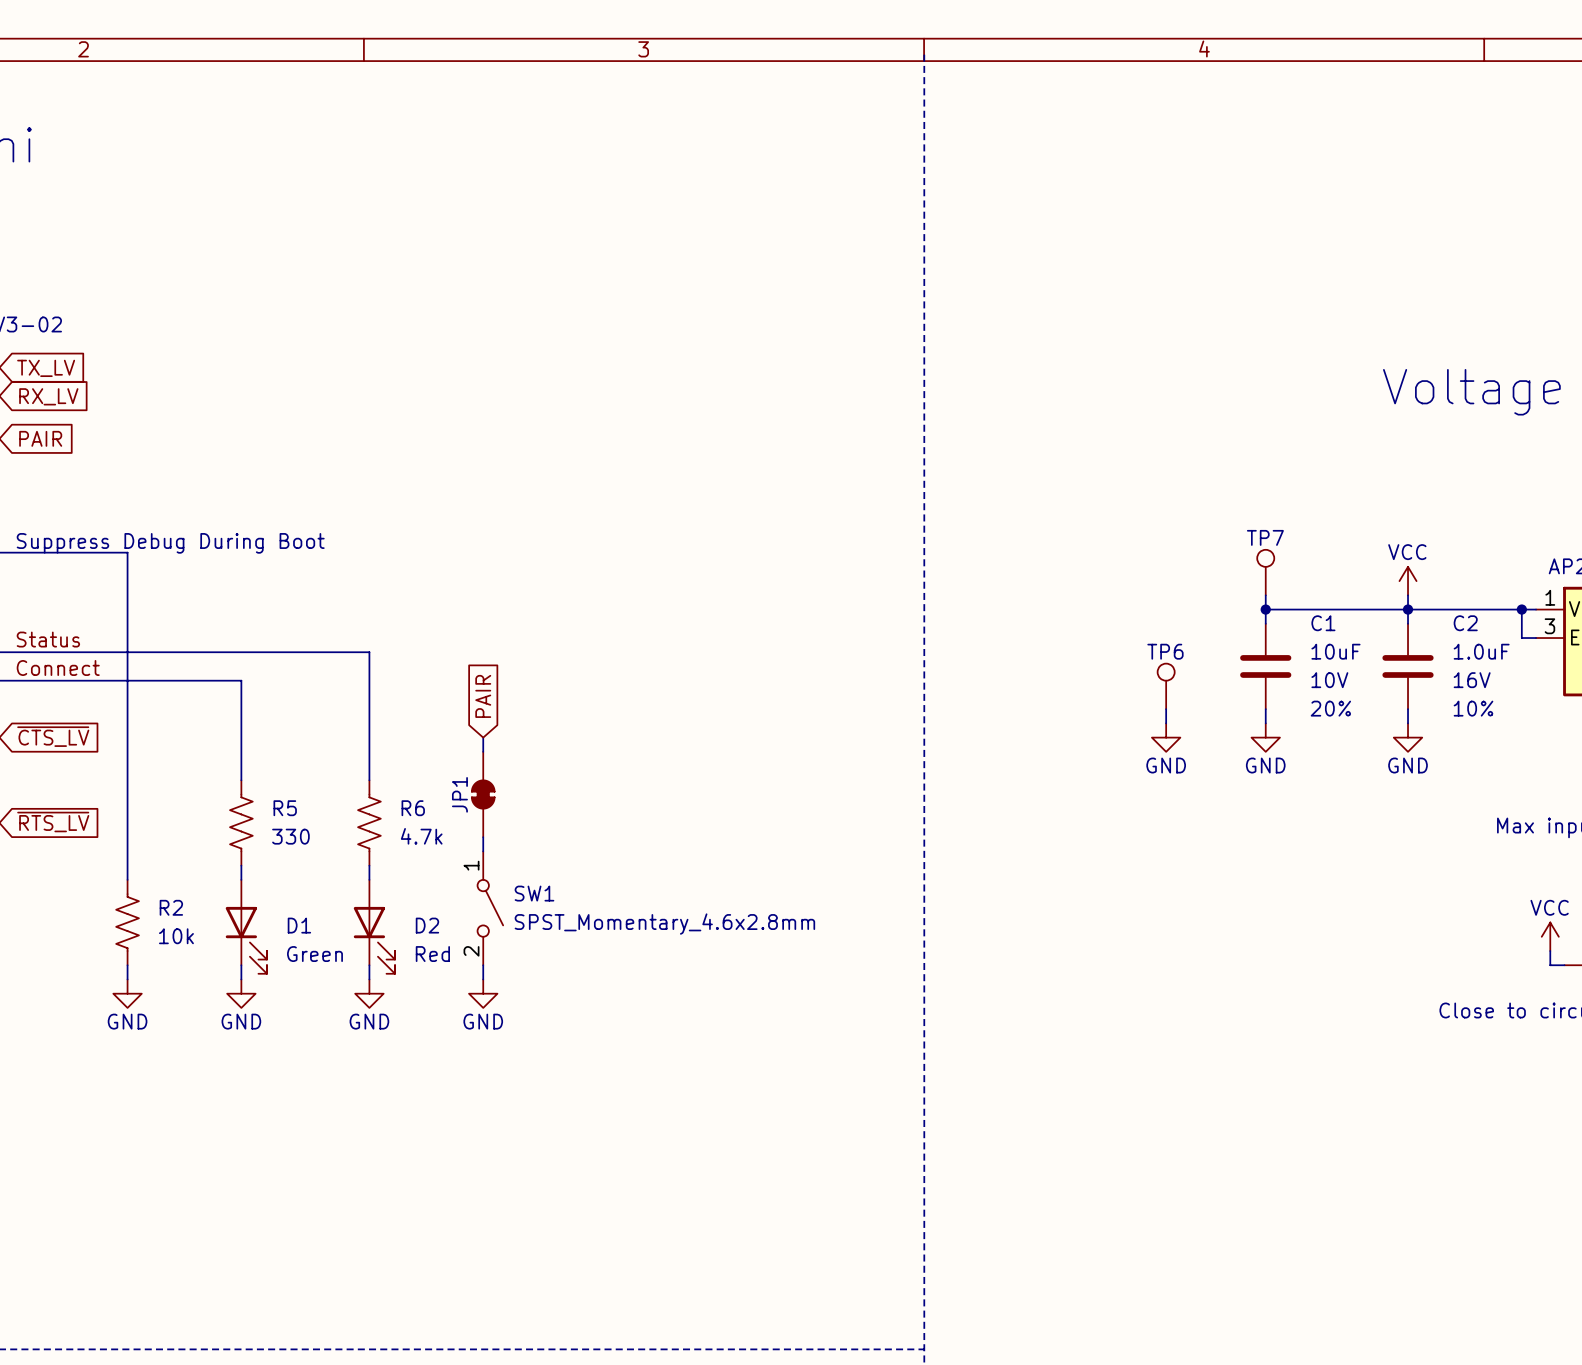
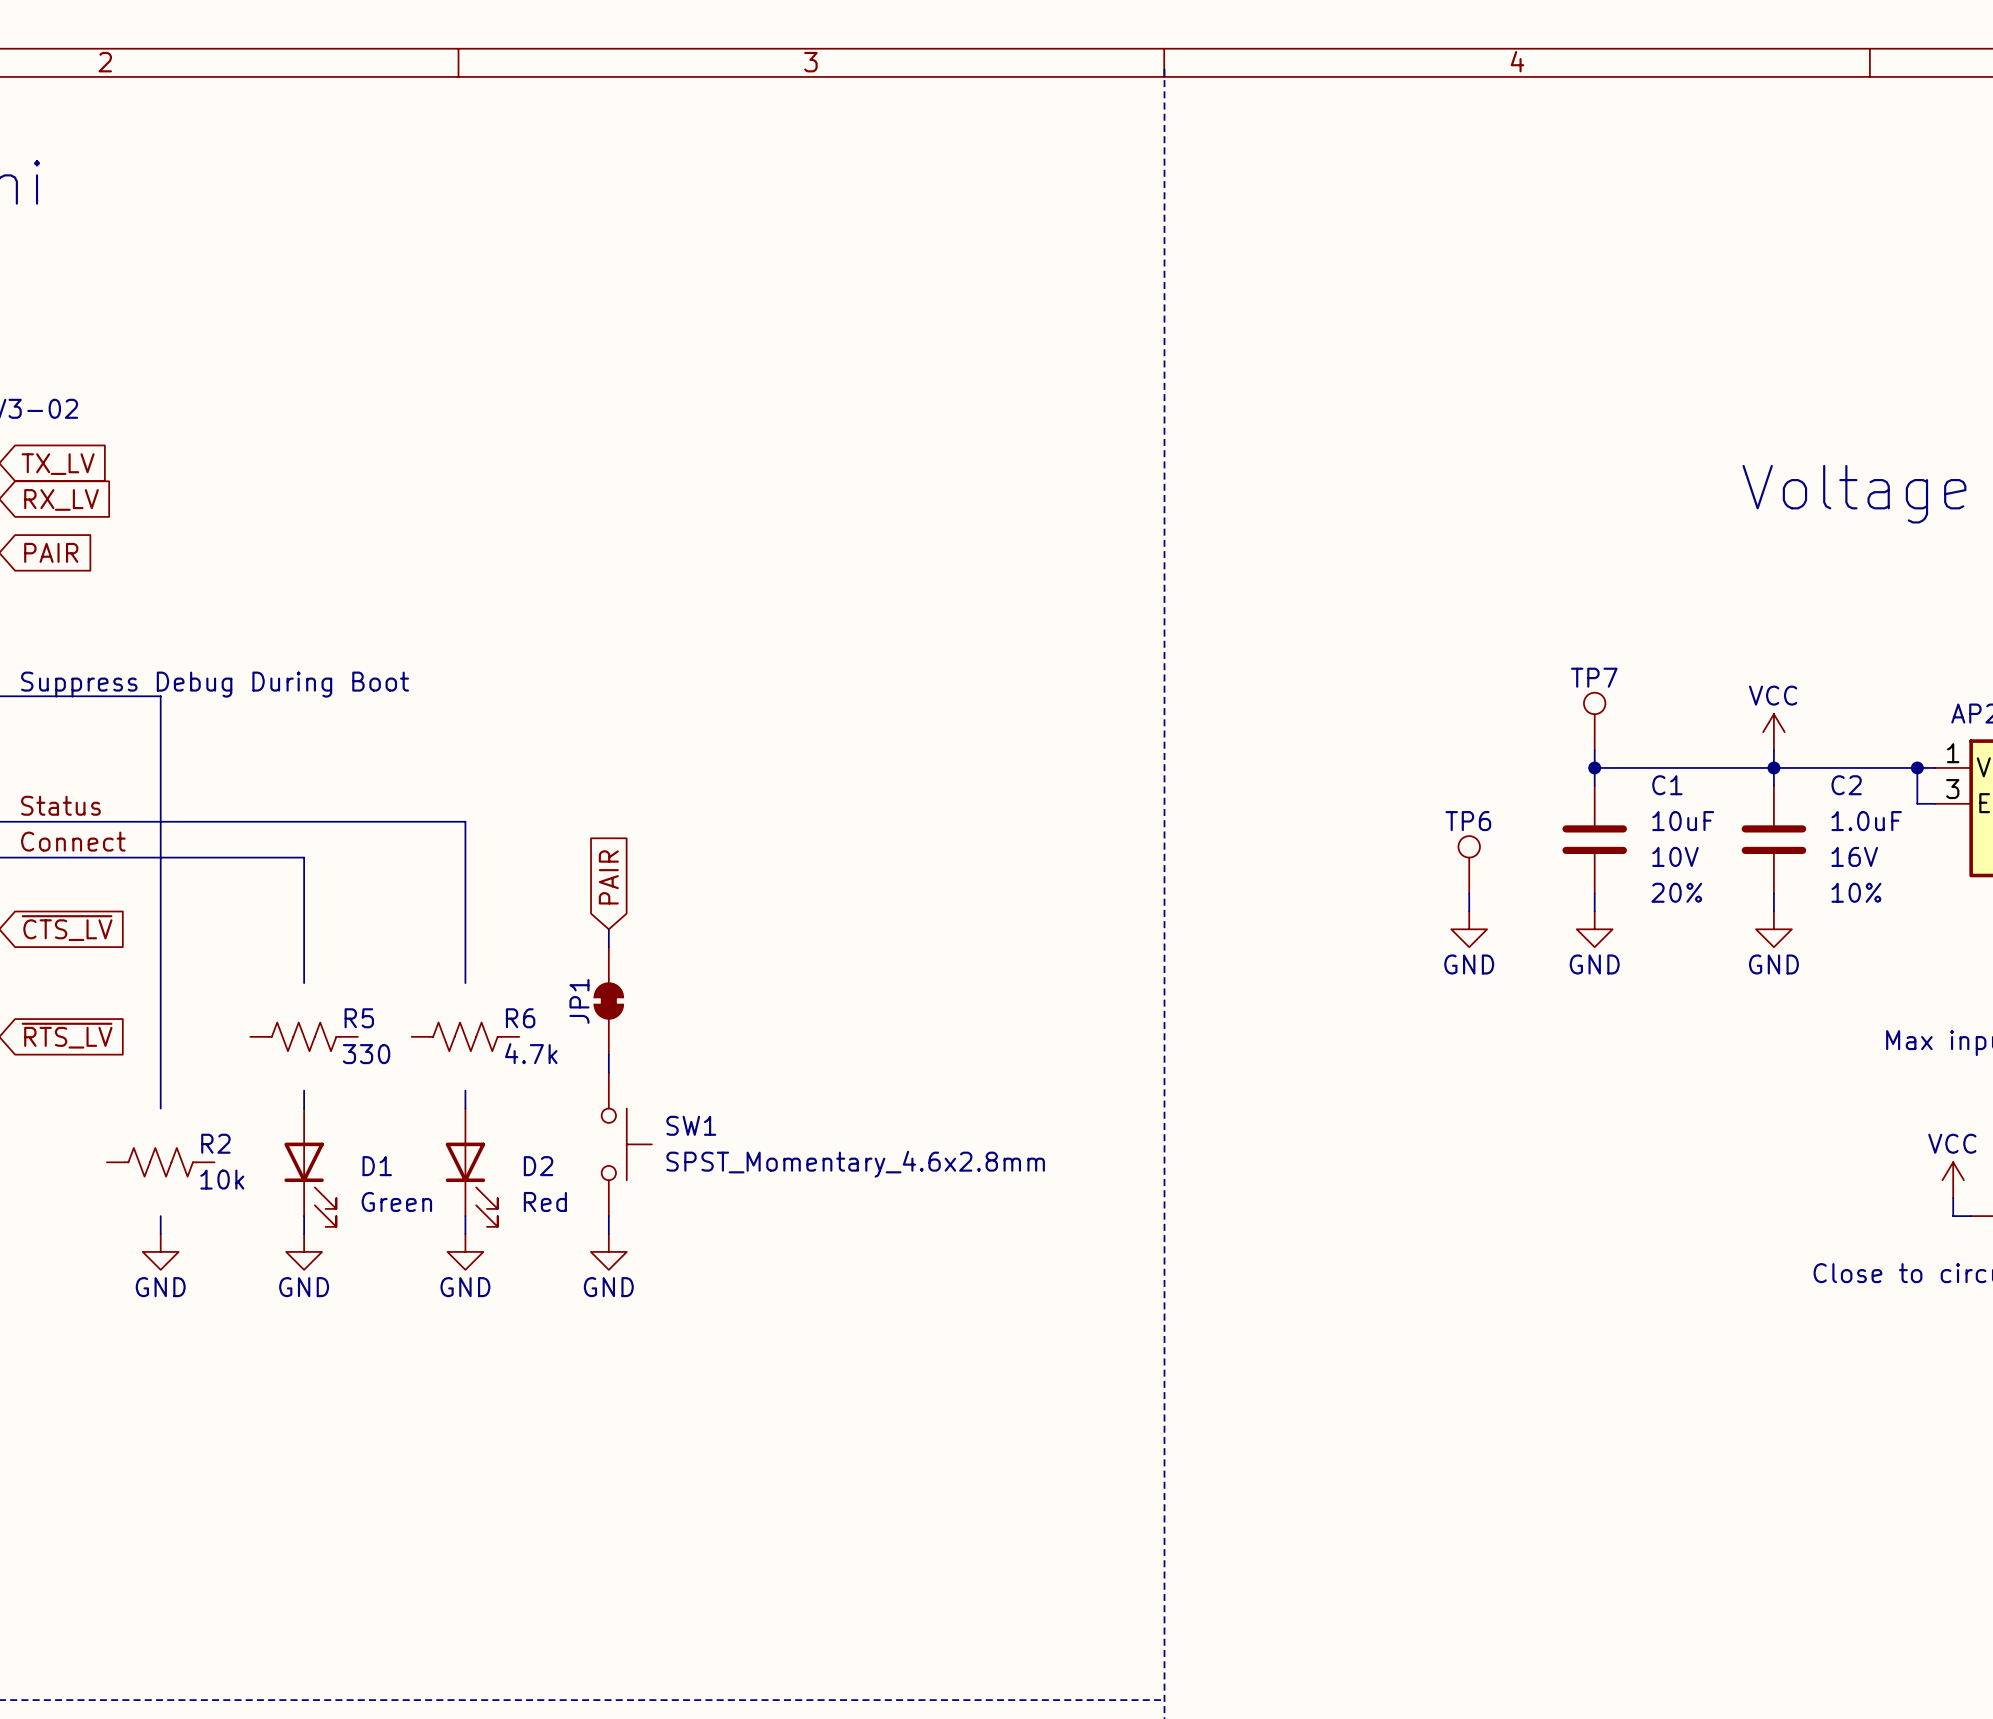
R5 rotation: 0° (241, 822) -> 90° clockwise (304, 1036)
R6 rotation: 0° (369, 822) -> 90° clockwise (465, 1036)
SW1 symbol: [477, 851, 504, 966] -> [601, 1072, 652, 1217]
R2 rotation: 0° (127, 922) -> 90° clockwise (160, 1162)

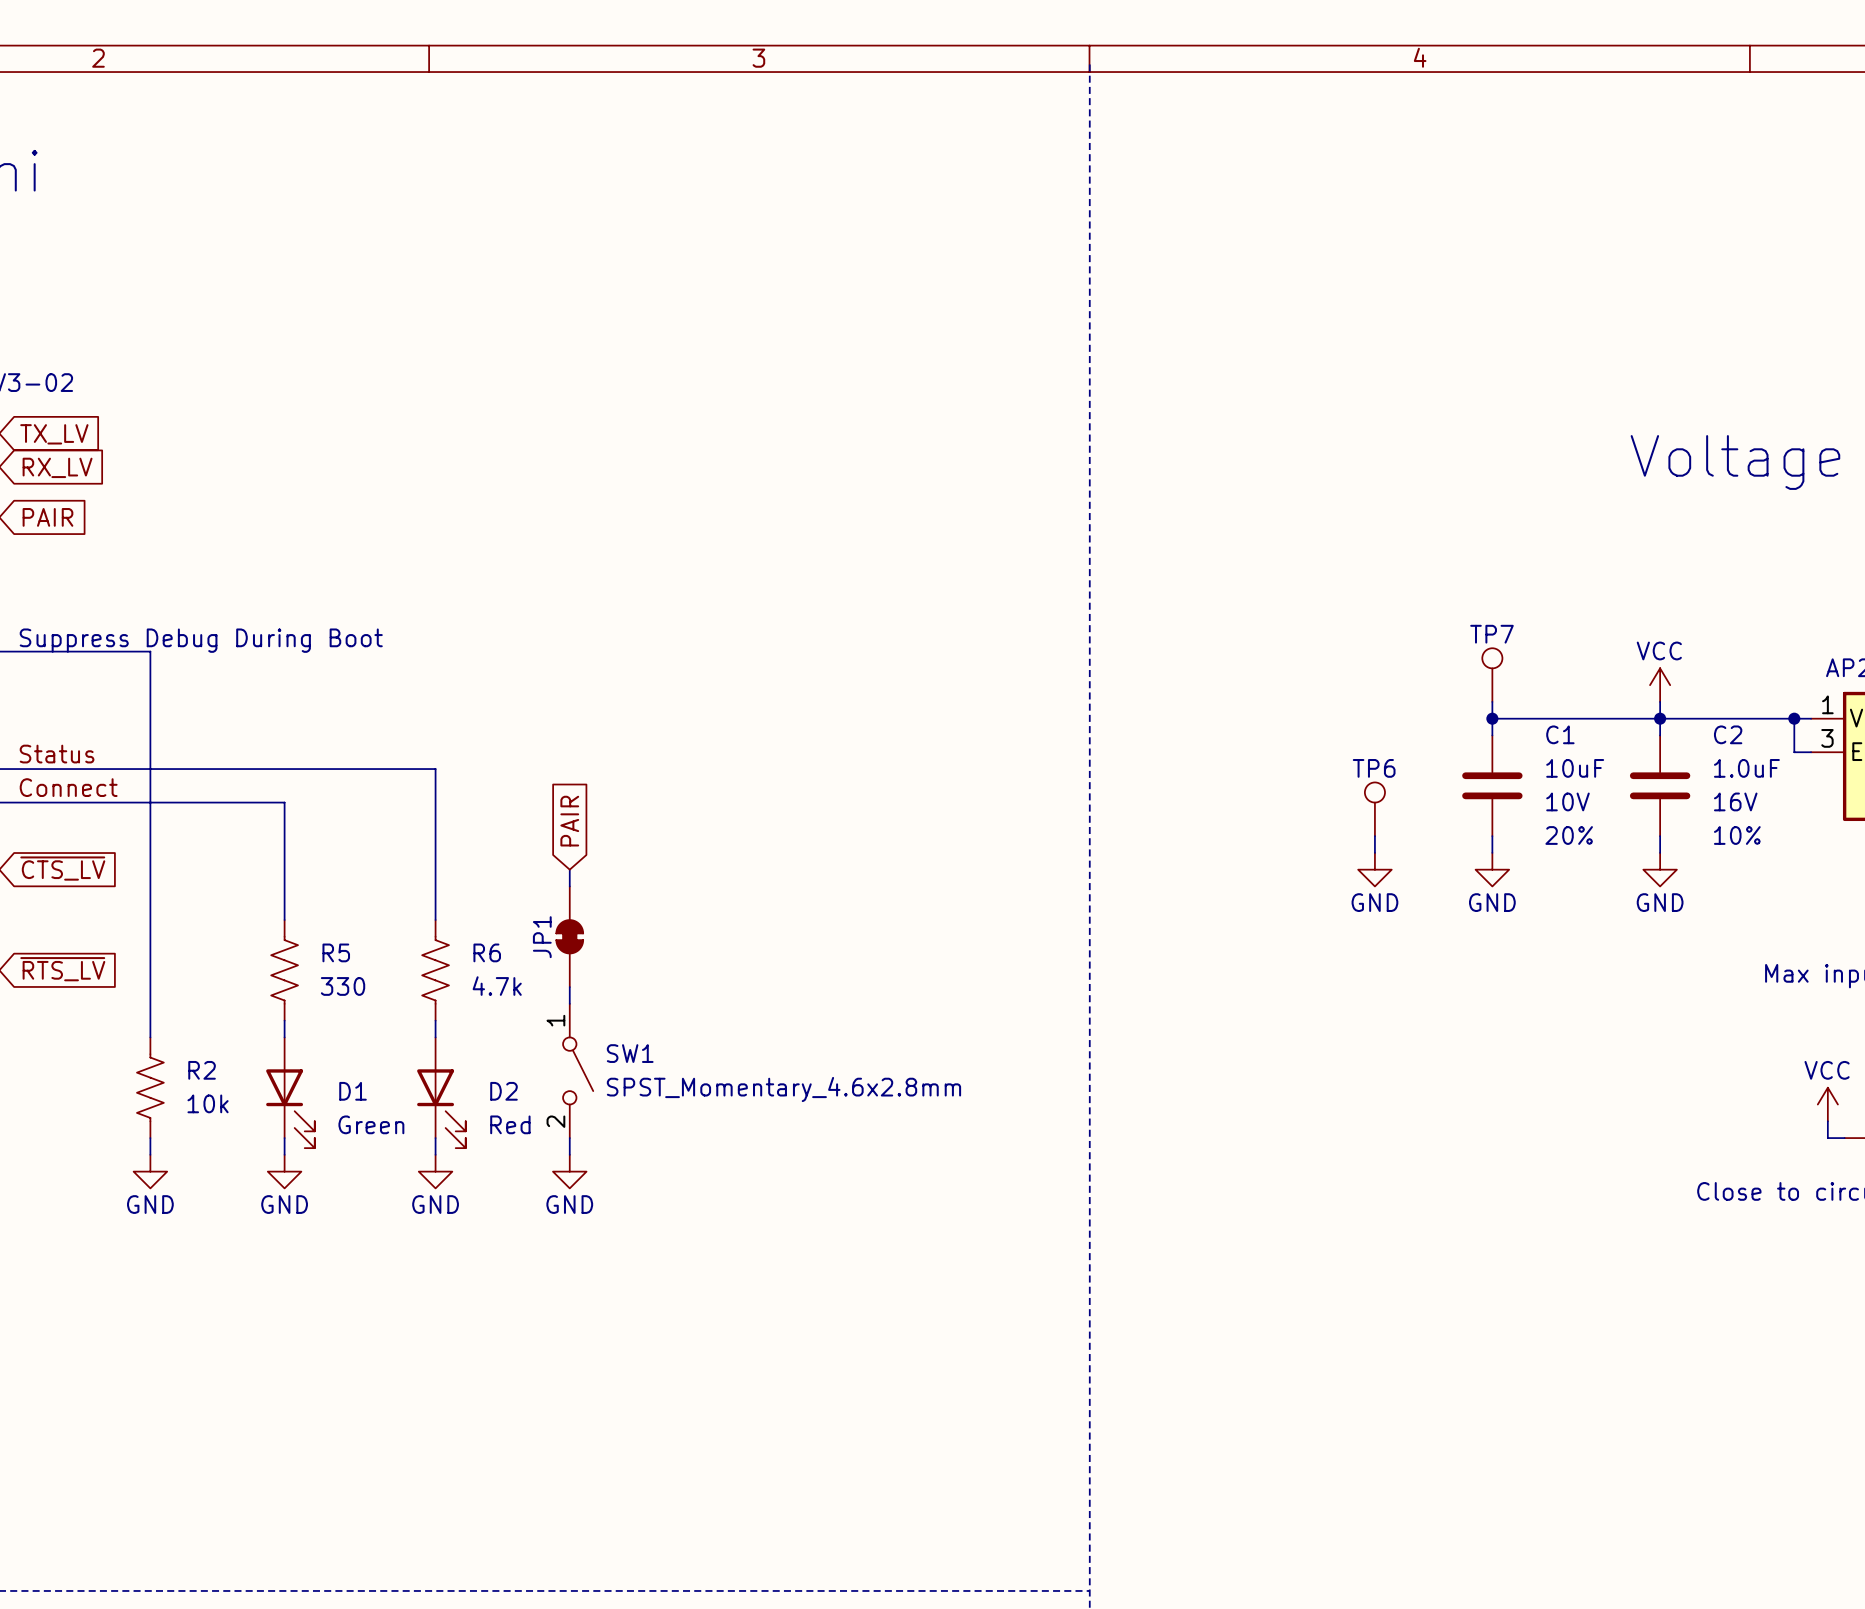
R5 rotation: 0° (304, 1036) -> 90° clockwise (284, 970)
R6 rotation: 0° (465, 1036) -> 90° clockwise (435, 970)
SW1 symbol: [601, 1072, 652, 1217] -> [563, 1003, 594, 1139]
R2 rotation: 0° (160, 1162) -> 90° clockwise (150, 1087)

